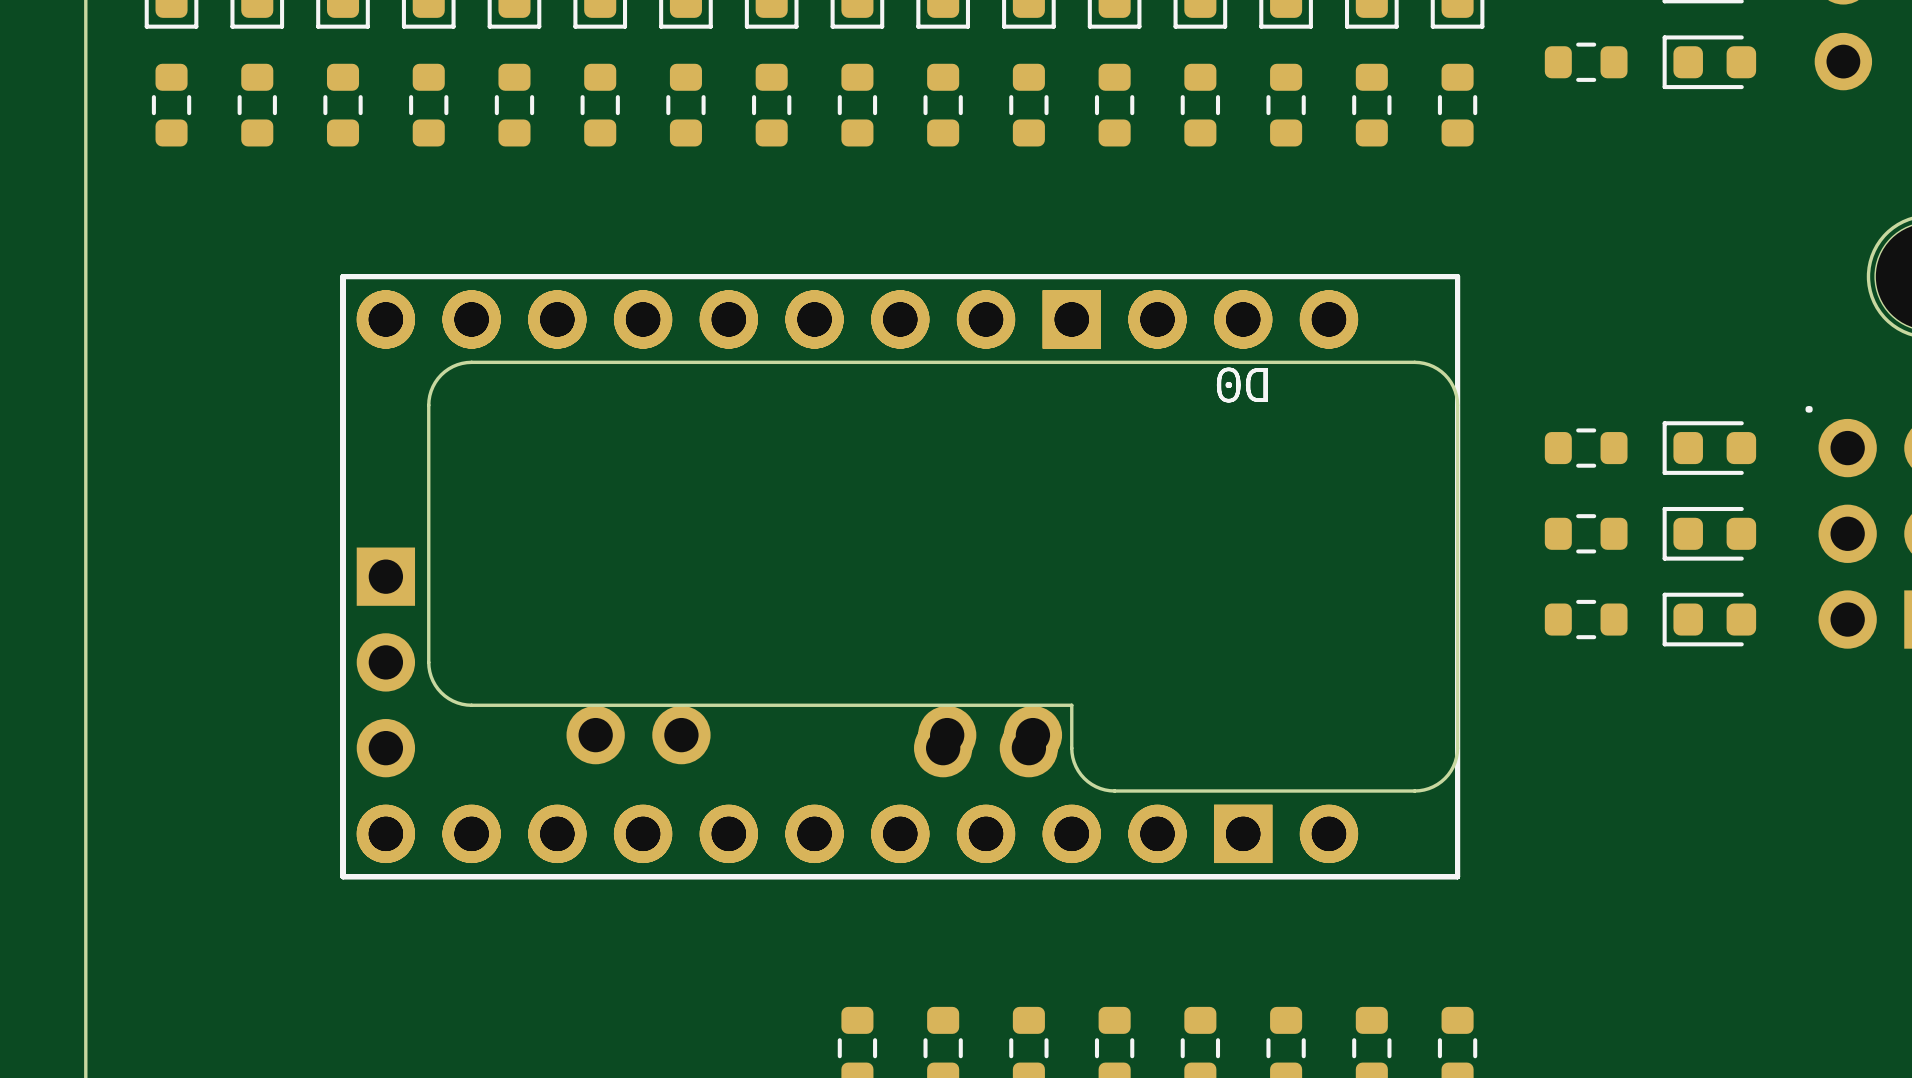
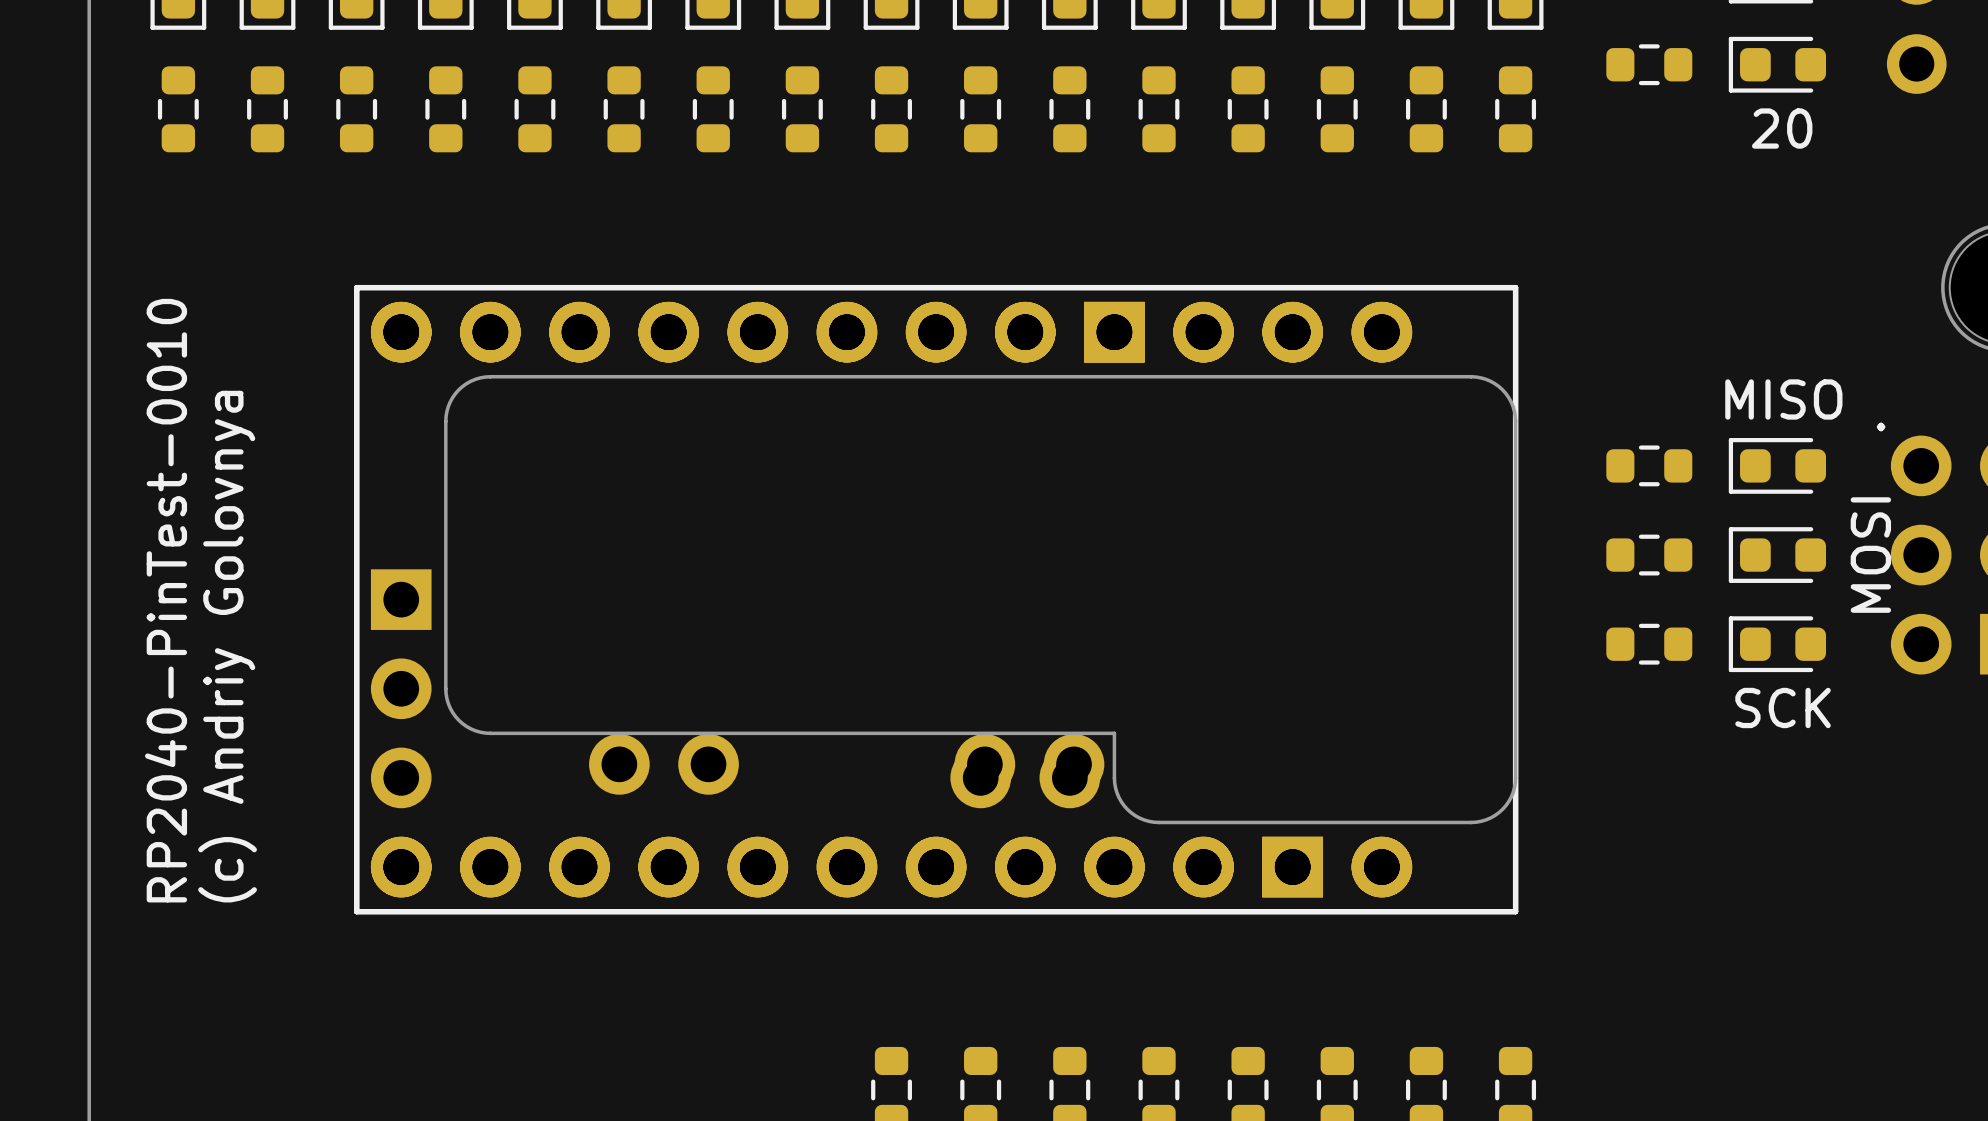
text: none -> 20 (1782, 128)
text: none -> MISO (1783, 399)
text: none -> MOSI (1870, 555)
part: (900, 576) -> none
part: (900, 576) -> none
text: none -> (c) Andriy Golovnya (227, 646)
text: none -> RP2040-PinTest-0010 (166, 600)
text: none -> SCK (1783, 707)

